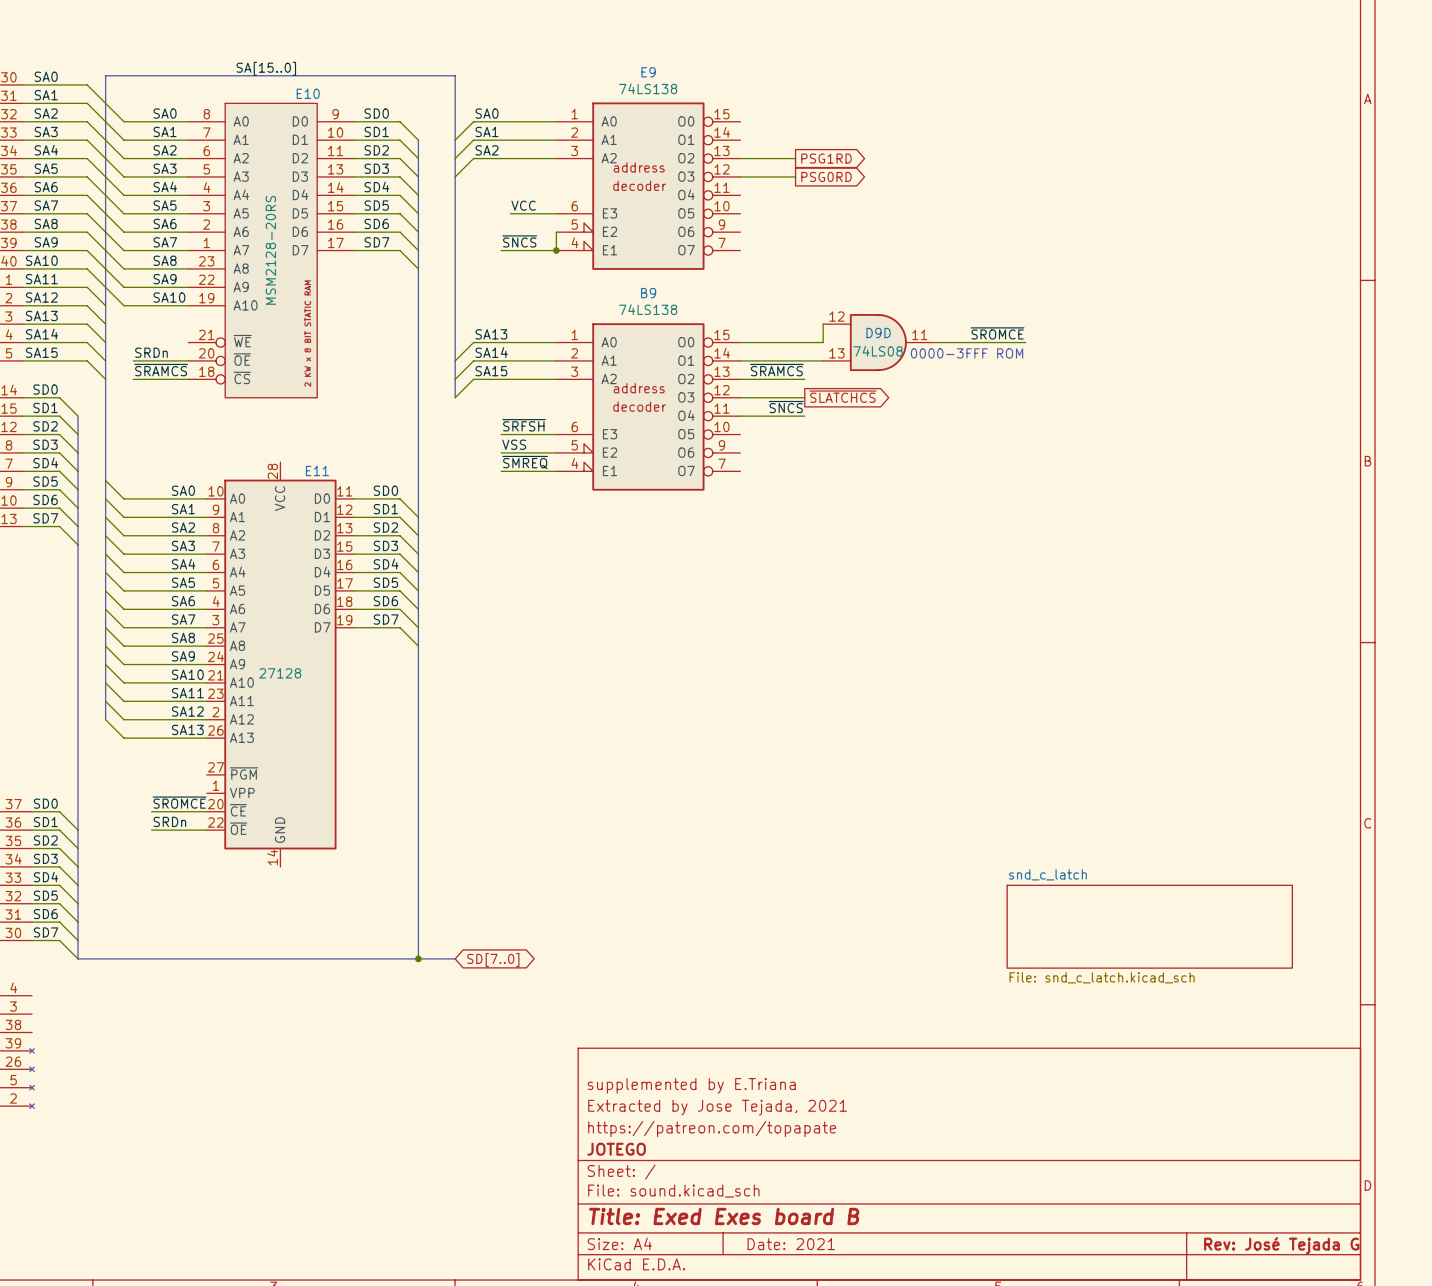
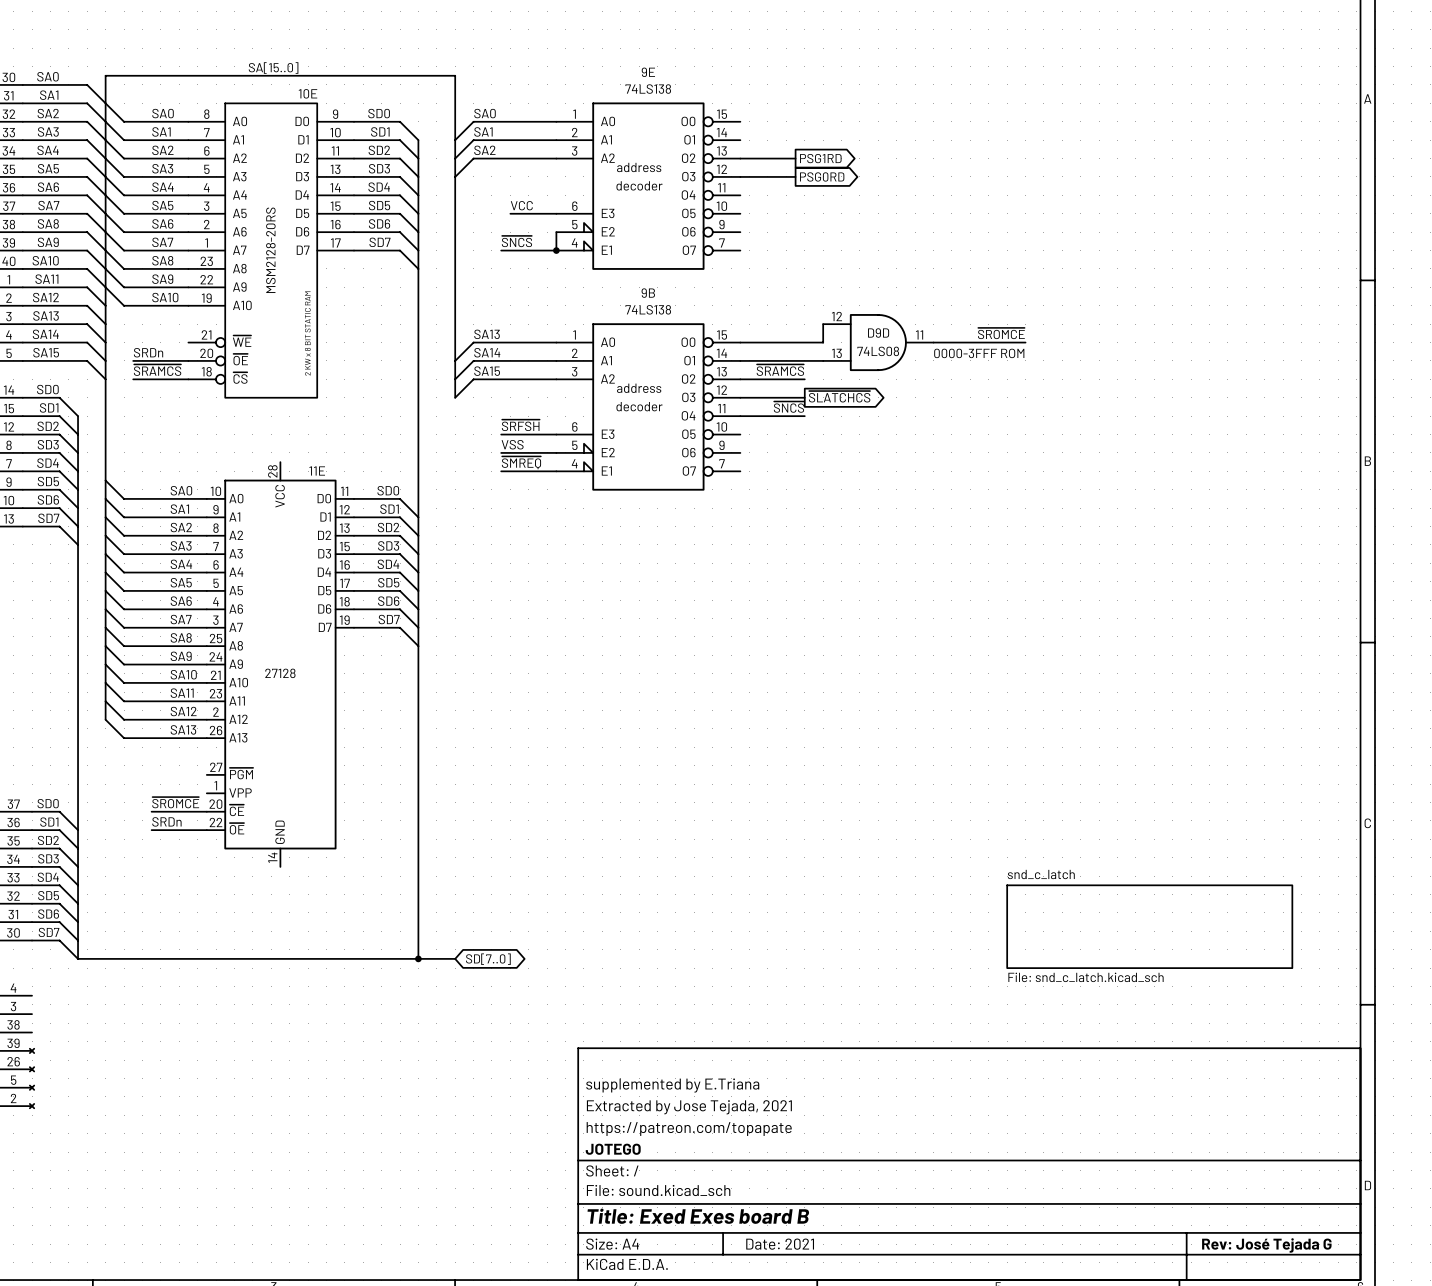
E9 name: E9 (648, 72) -> 9E (648, 72)
E10 name: E10 (308, 93) -> 10E (308, 93)
B9 name: B9 (648, 293) -> 9B (648, 293)
E11 name: E11 (317, 471) -> 11E (317, 471)

